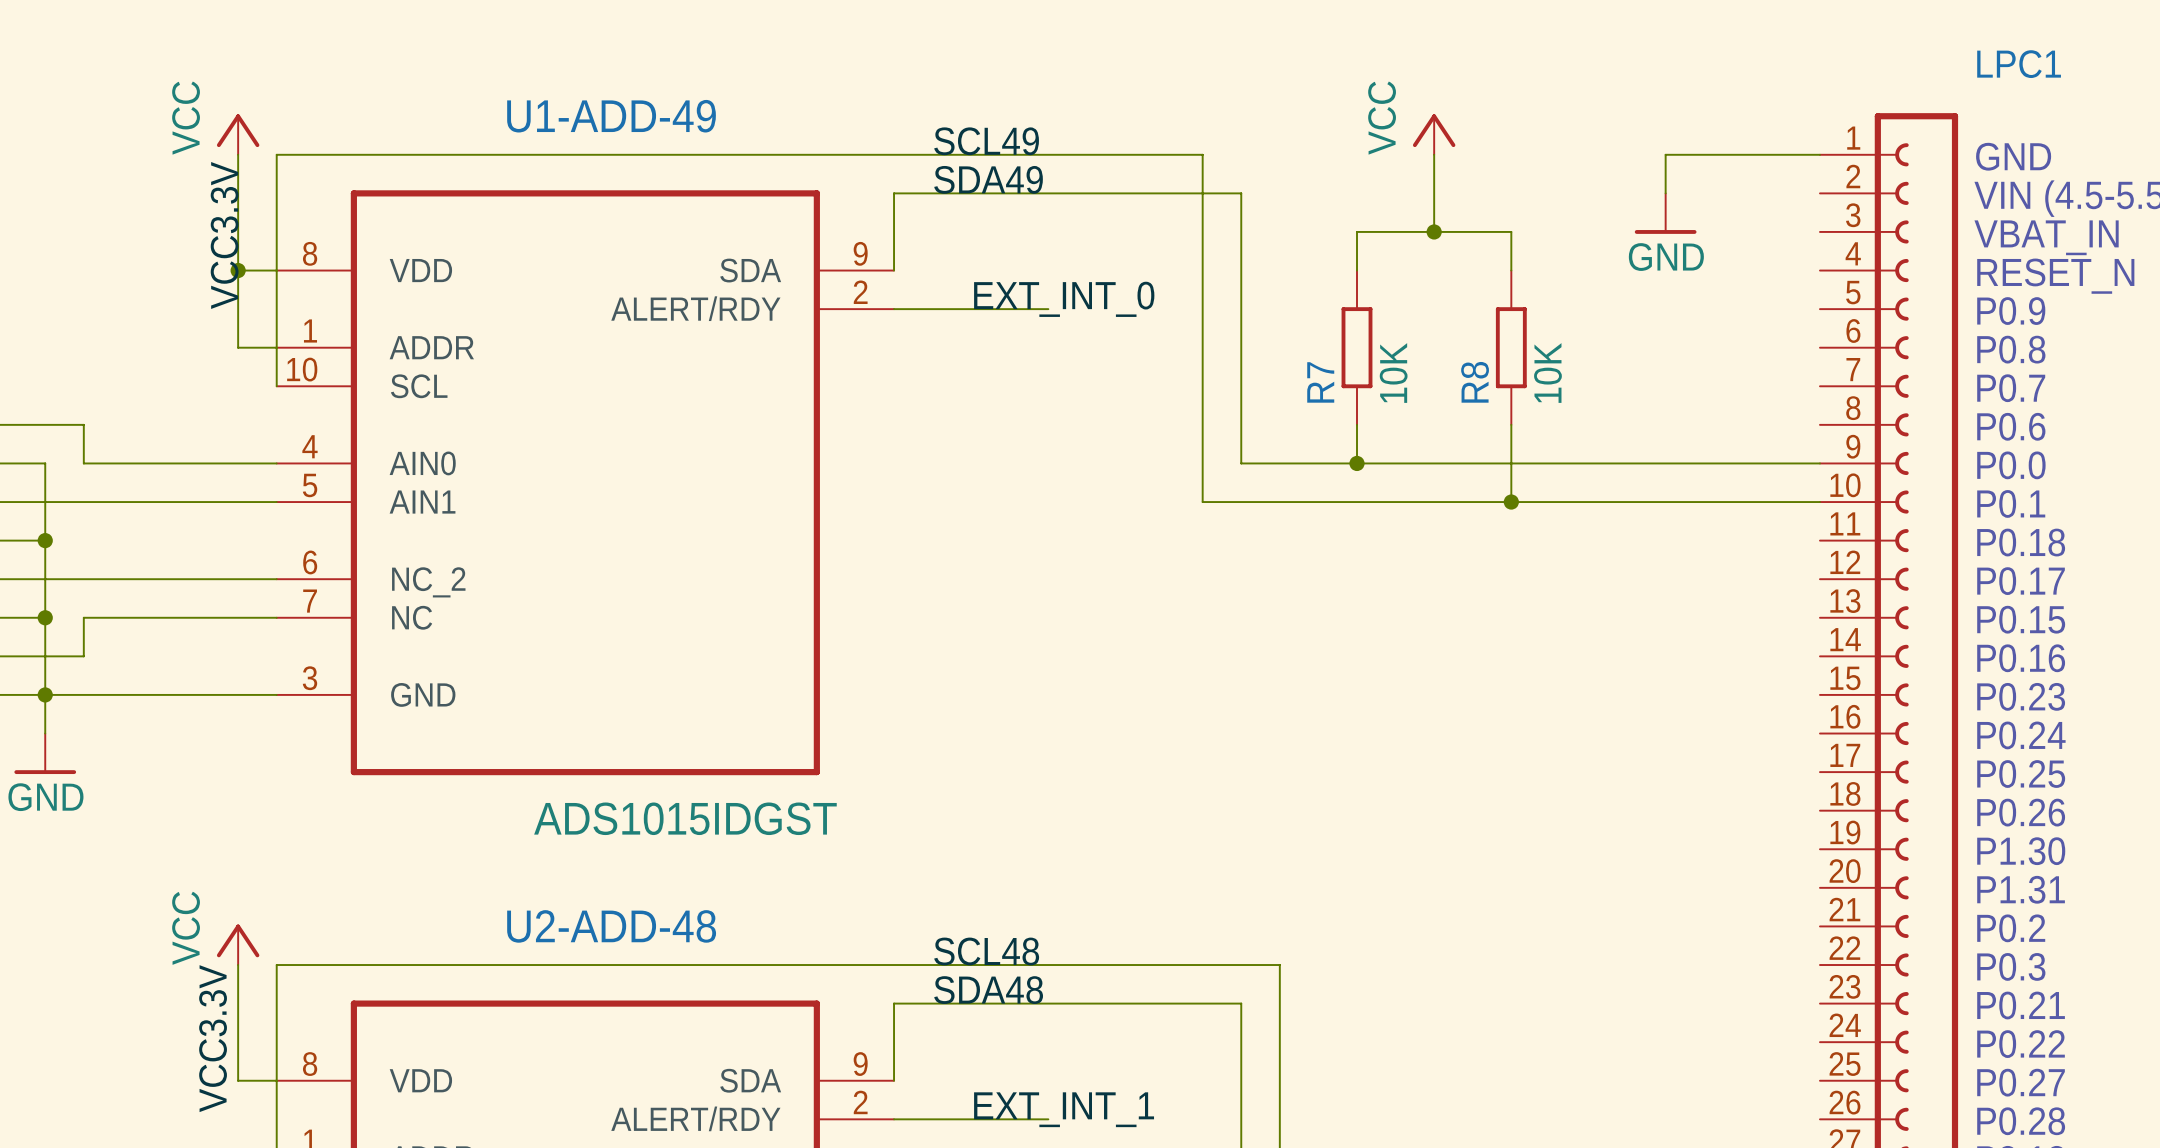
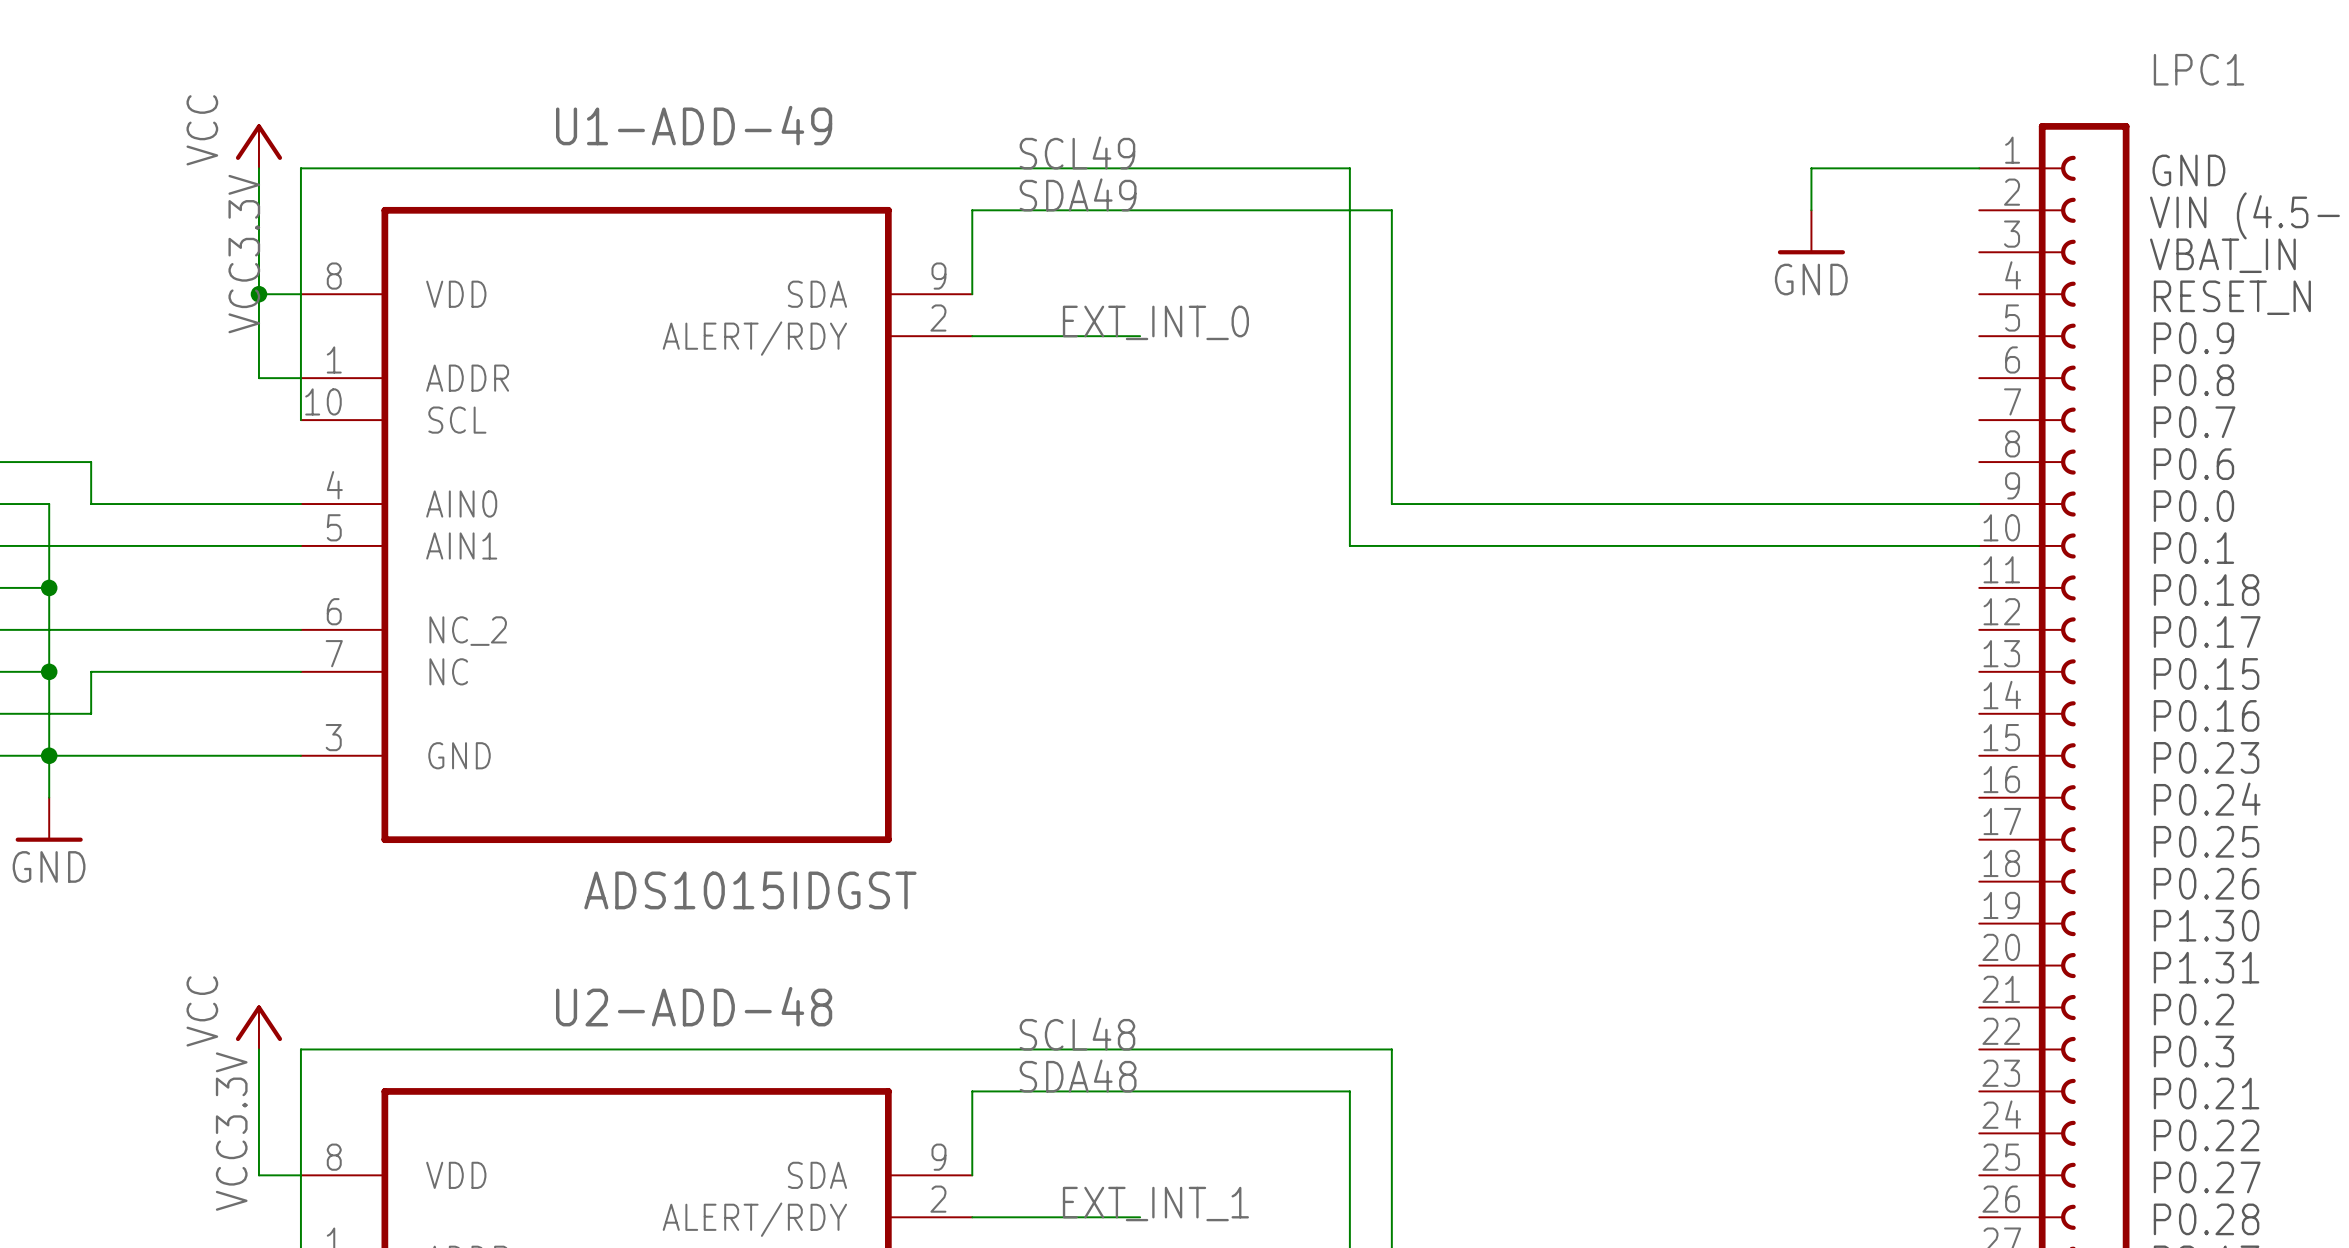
power symbol: VCC (1434, 134) -> none
wire: (1202, 154) (1202, 502) (1241, 502) -> (1307, 168) (1349, 168) (1349, 210) (1391, 210) (1391, 504)
wire: (1434, 154) (1434, 231) -> none
junction: (1434, 231) -> none
wire: (1357, 270) (1357, 231) (1511, 231) (1511, 270) -> none
R7: 10K (1357, 347) -> none
R8: 10K (1511, 347) -> none
wire: (1357, 424) (1357, 463) -> none
wire: (1511, 424) (1511, 502) -> none
wire: (1241, 463) (1279, 463) -> (1349, 504) (1349, 545)
junction: (1357, 463) -> none
junction: (1511, 502) -> none

